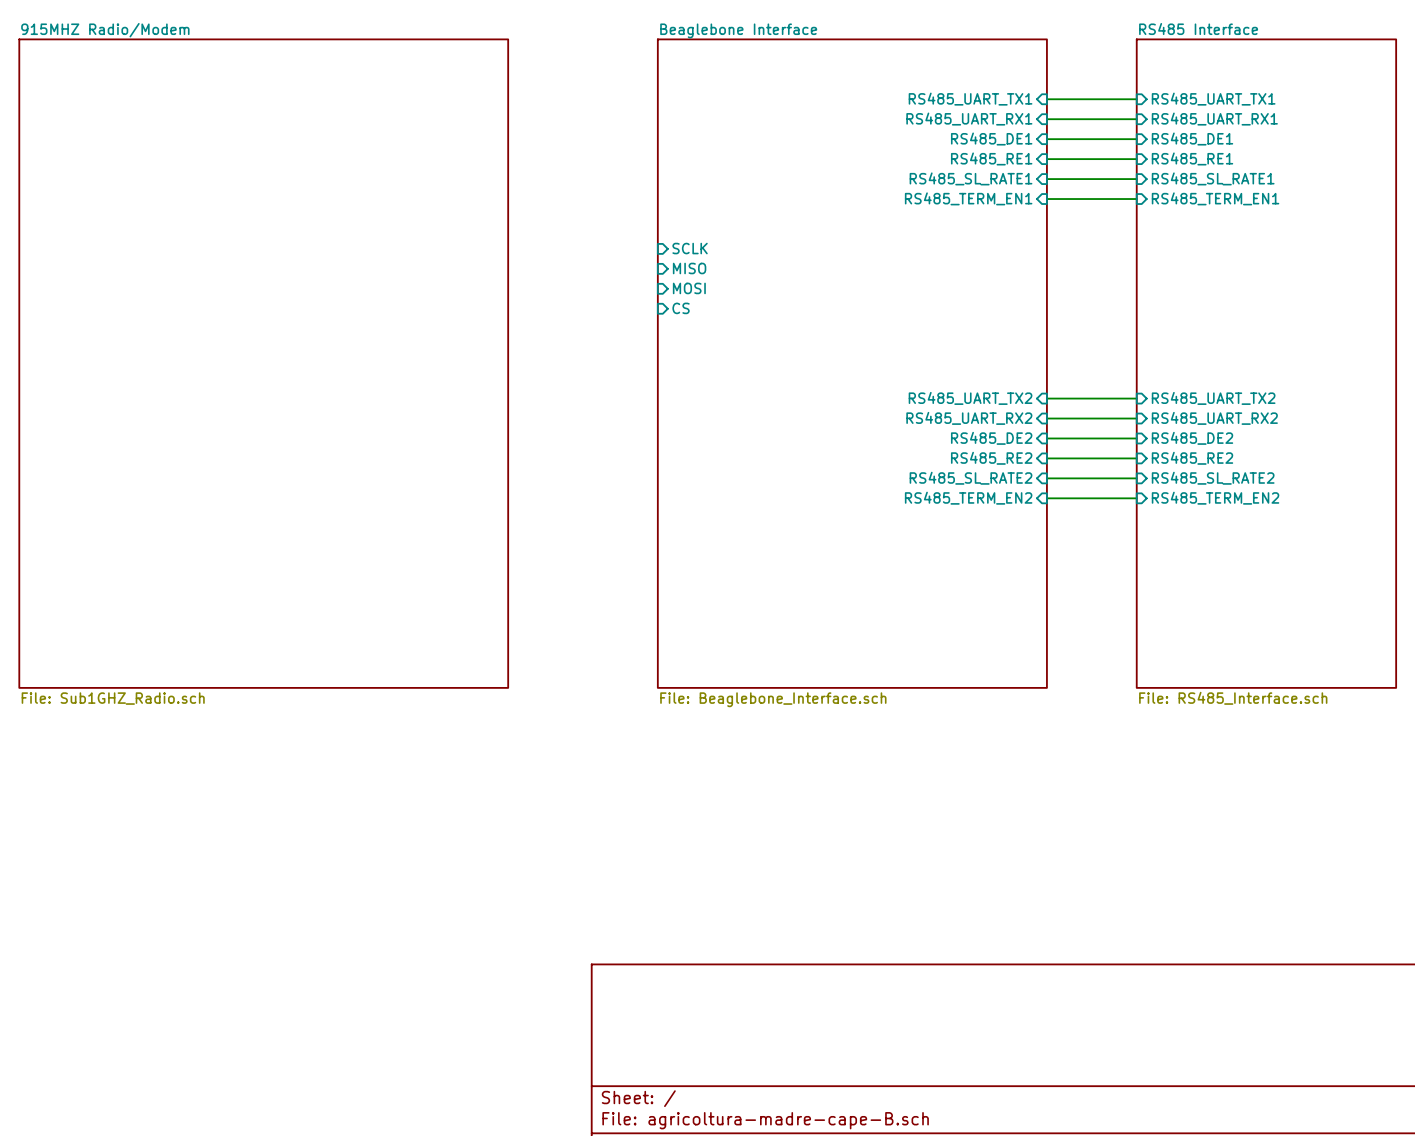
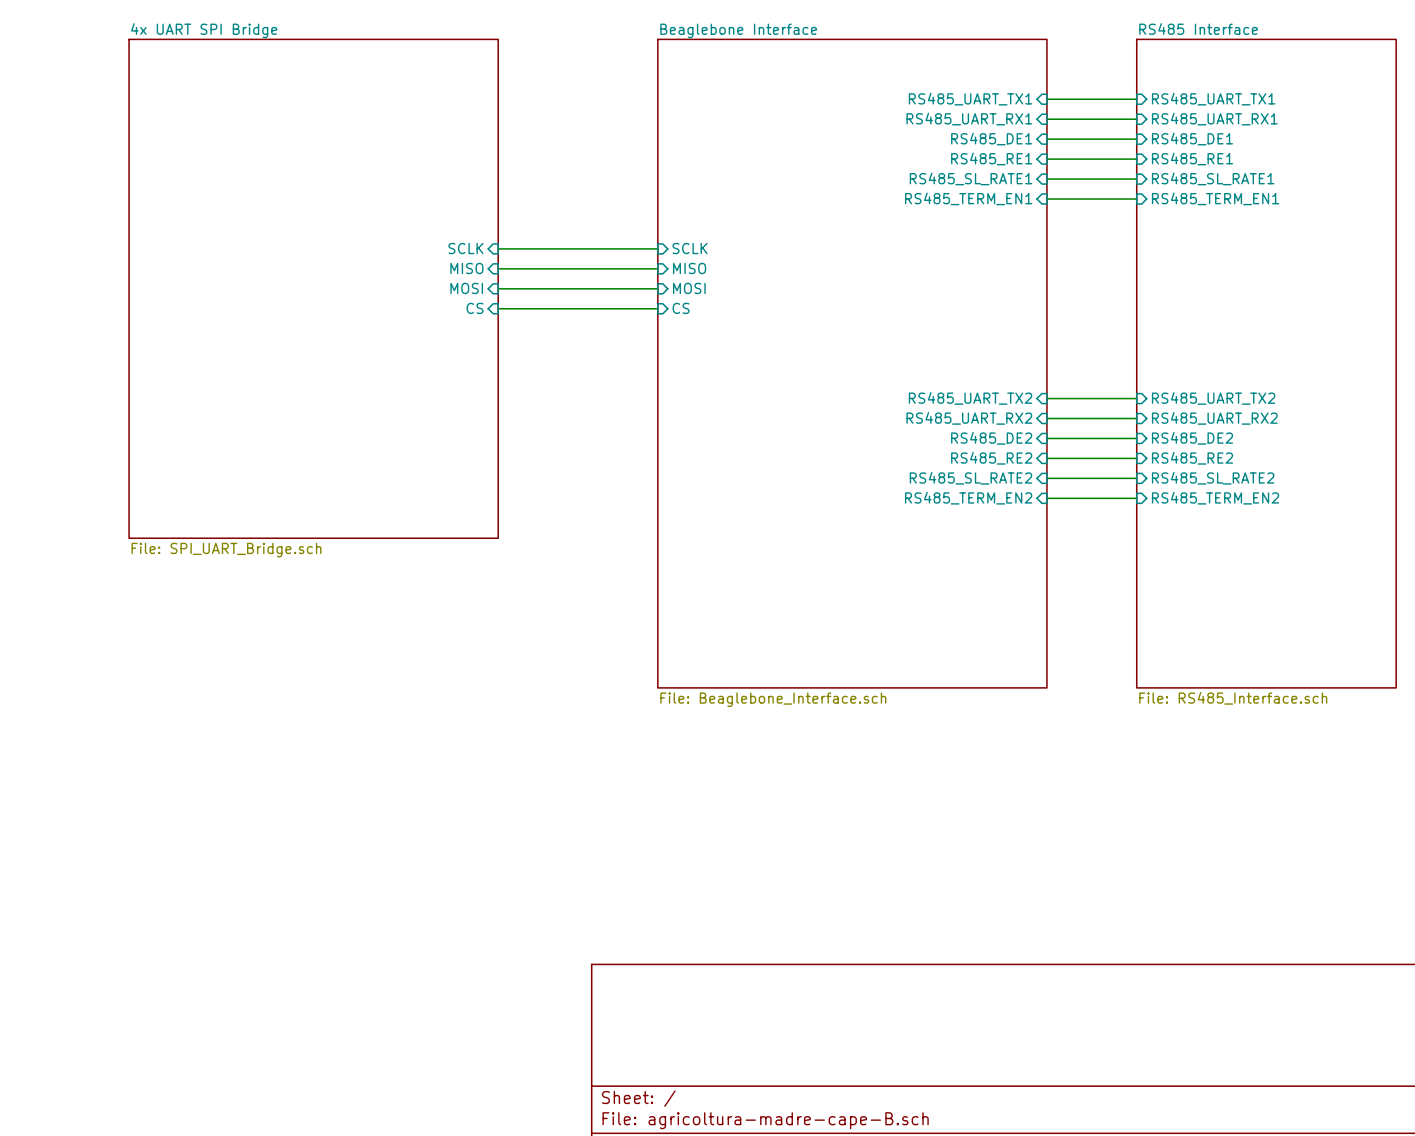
sheet pin: none -> SCLK (465, 248)
wire: none -> (498, 248) (657, 248)
sheet pin: none -> MISO (466, 268)
wire: none -> (498, 268) (657, 268)
sheet 4x UART SPI Bridge: none -> File: SPI_UART_Bridge.sch (313, 288)
sheet pin: none -> MOSI (466, 288)
wire: none -> (498, 288) (657, 288)
sheet pin: none -> CS (475, 308)
wire: none -> (498, 308) (657, 308)
sheet 915MHZ Radio/Modem: File: Sub1GHZ_Radio.sch (263, 363) -> none

